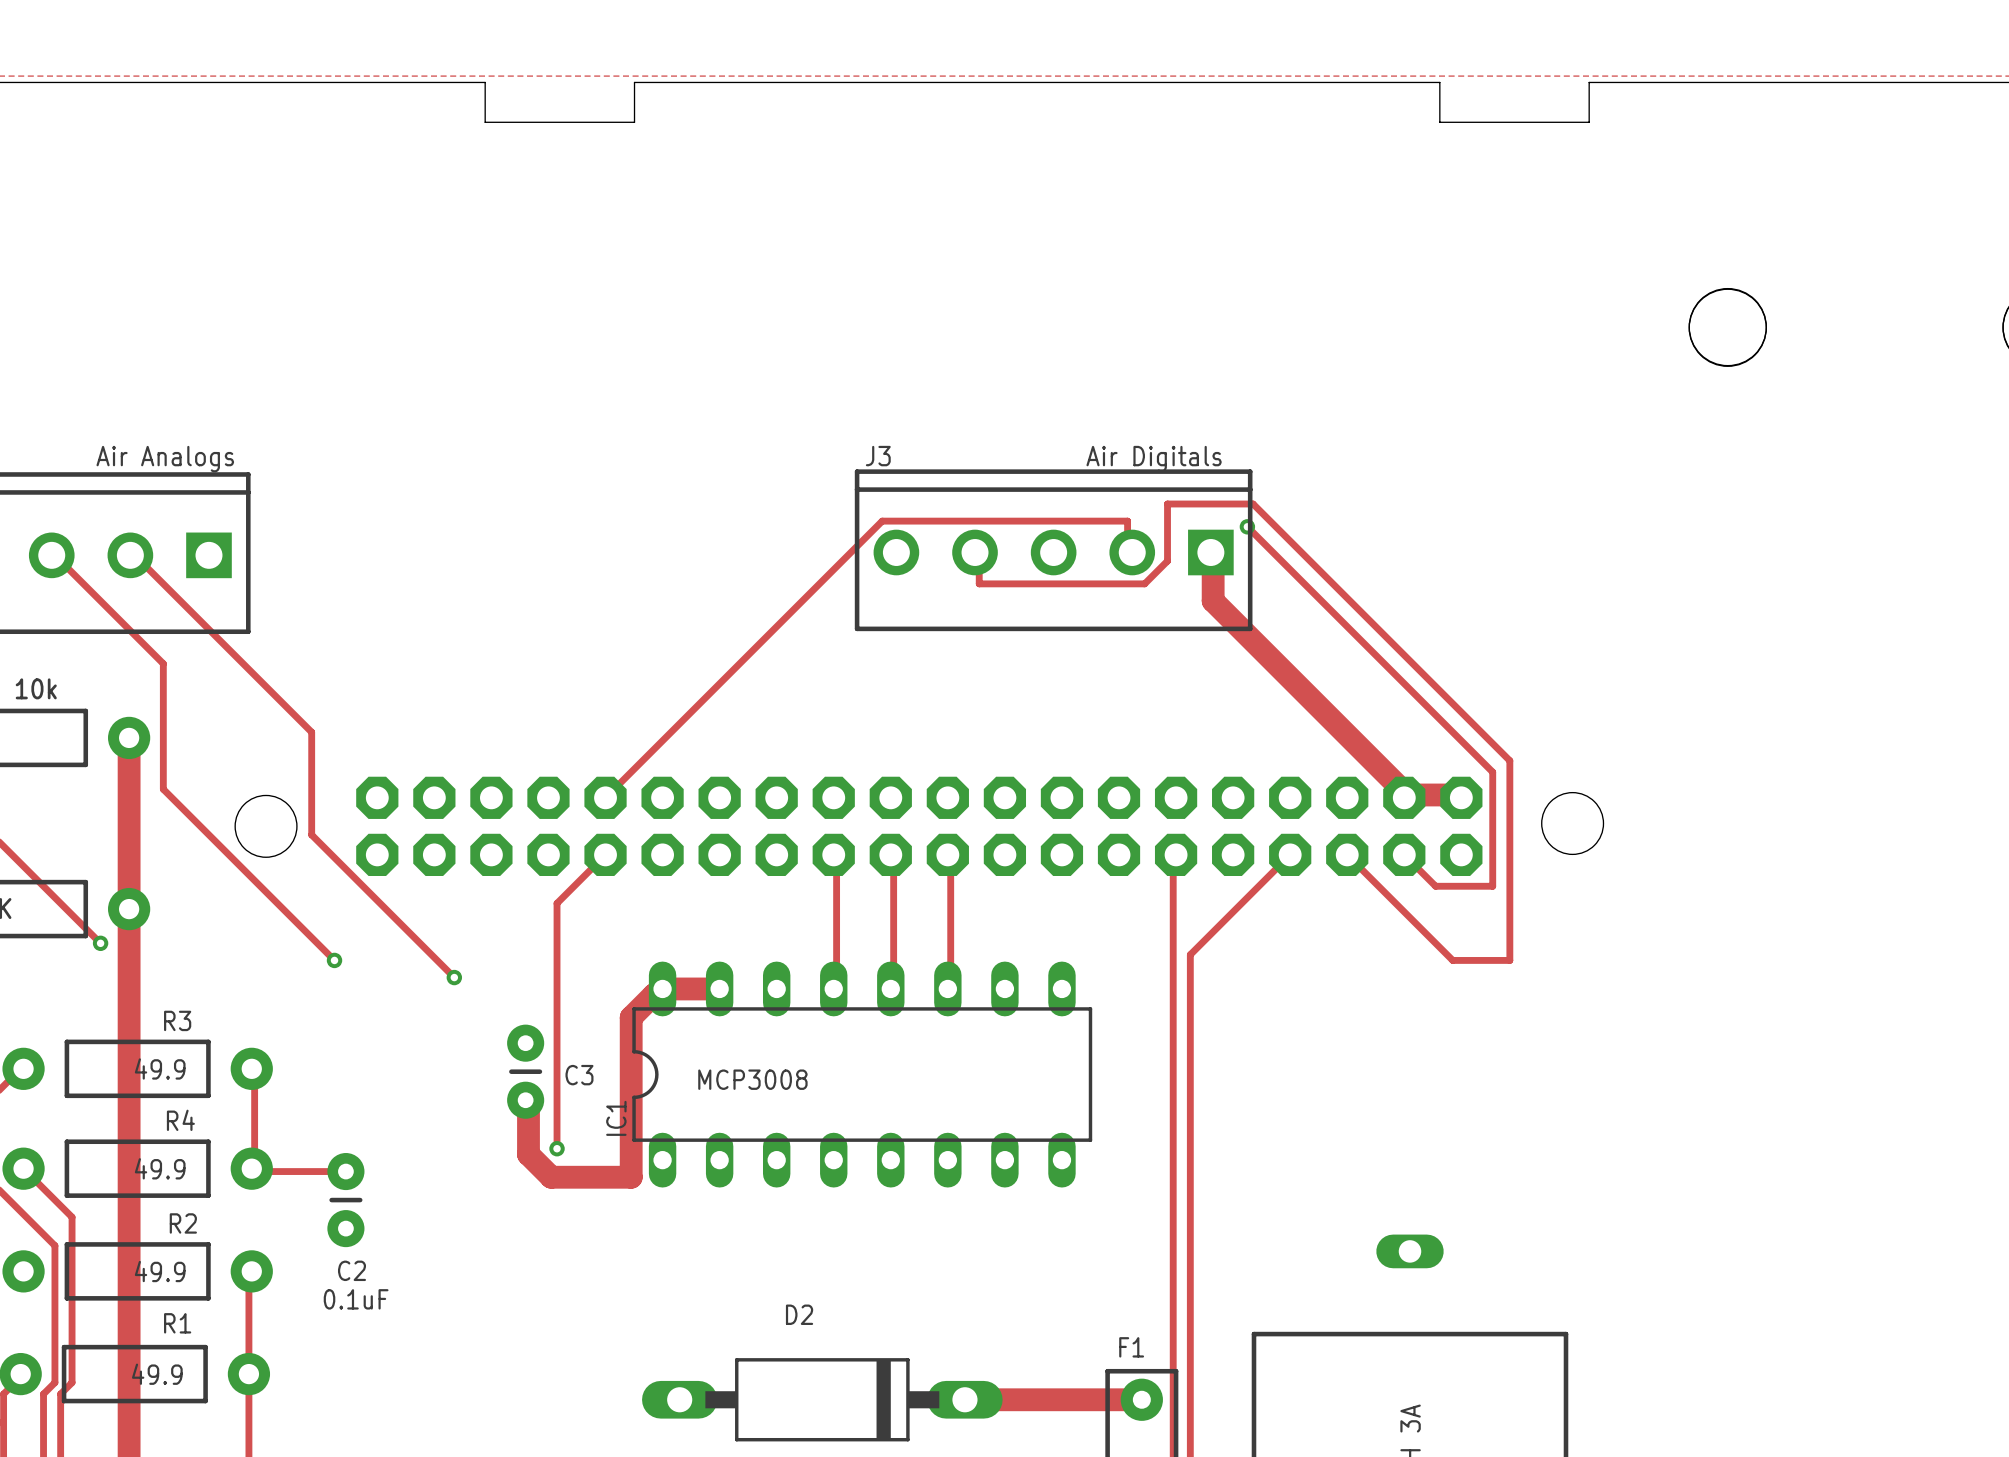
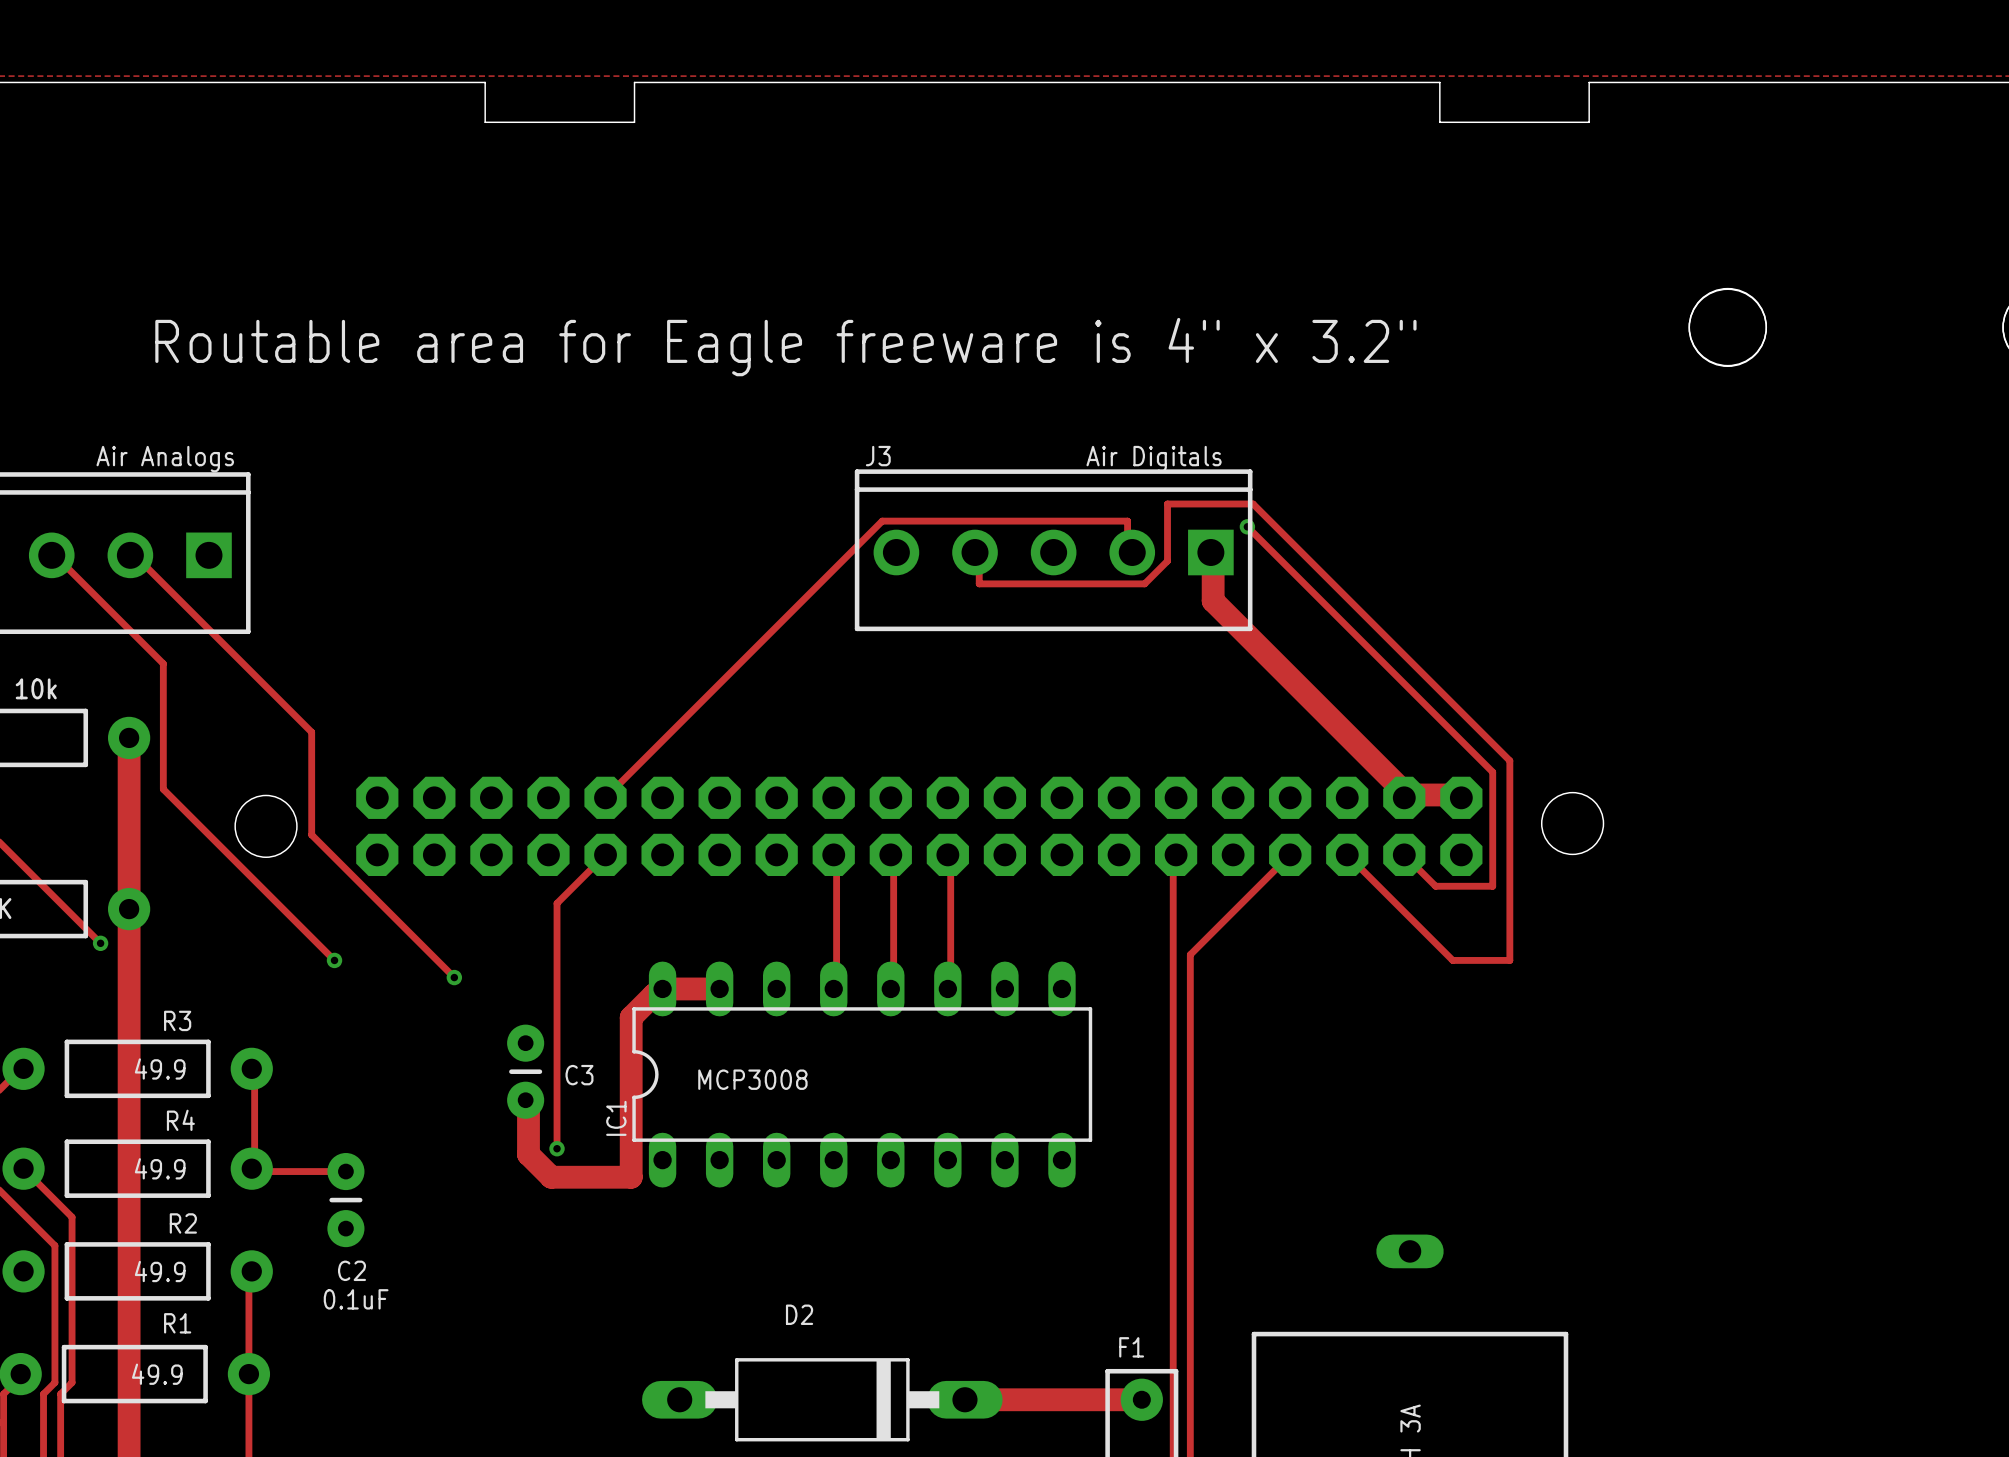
text: none -> Routable area for Eagle freeware is 4" x 3.2" (785, 347)

